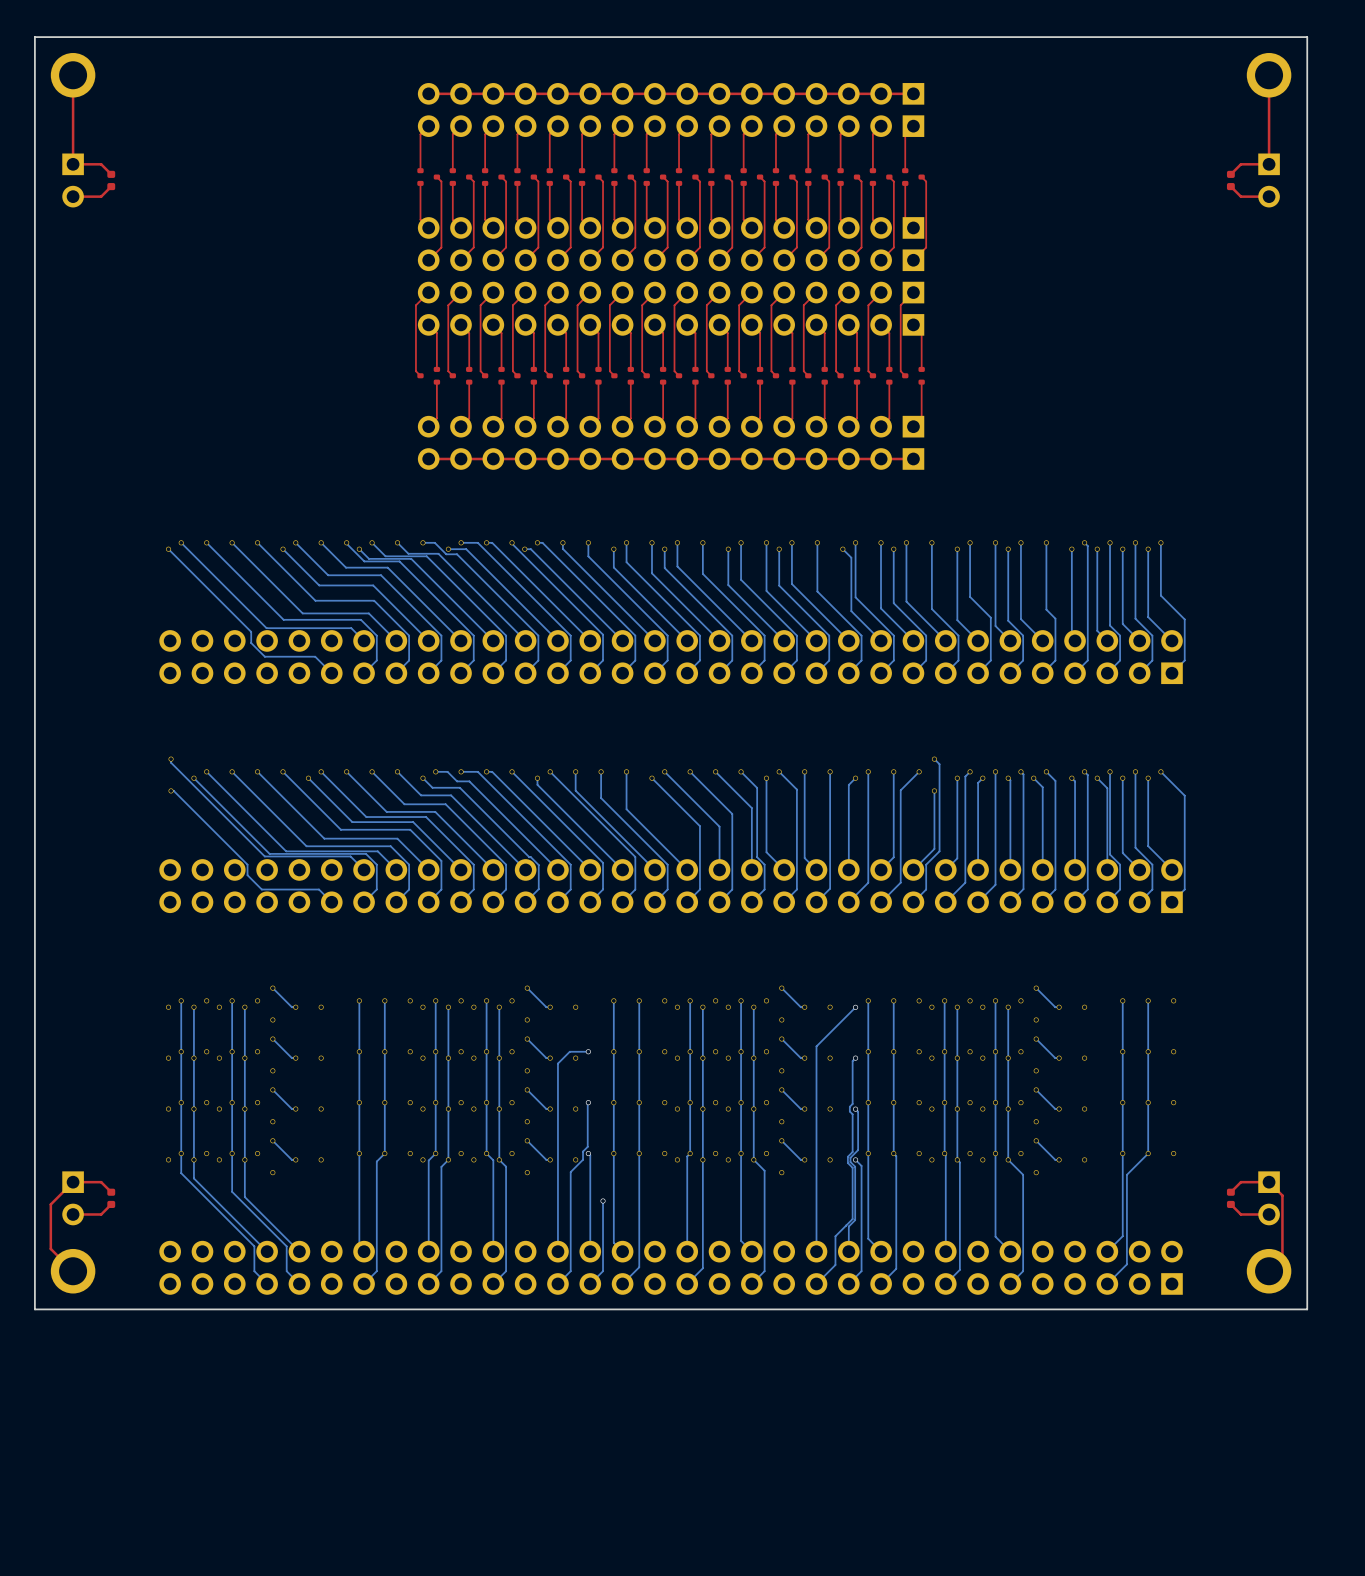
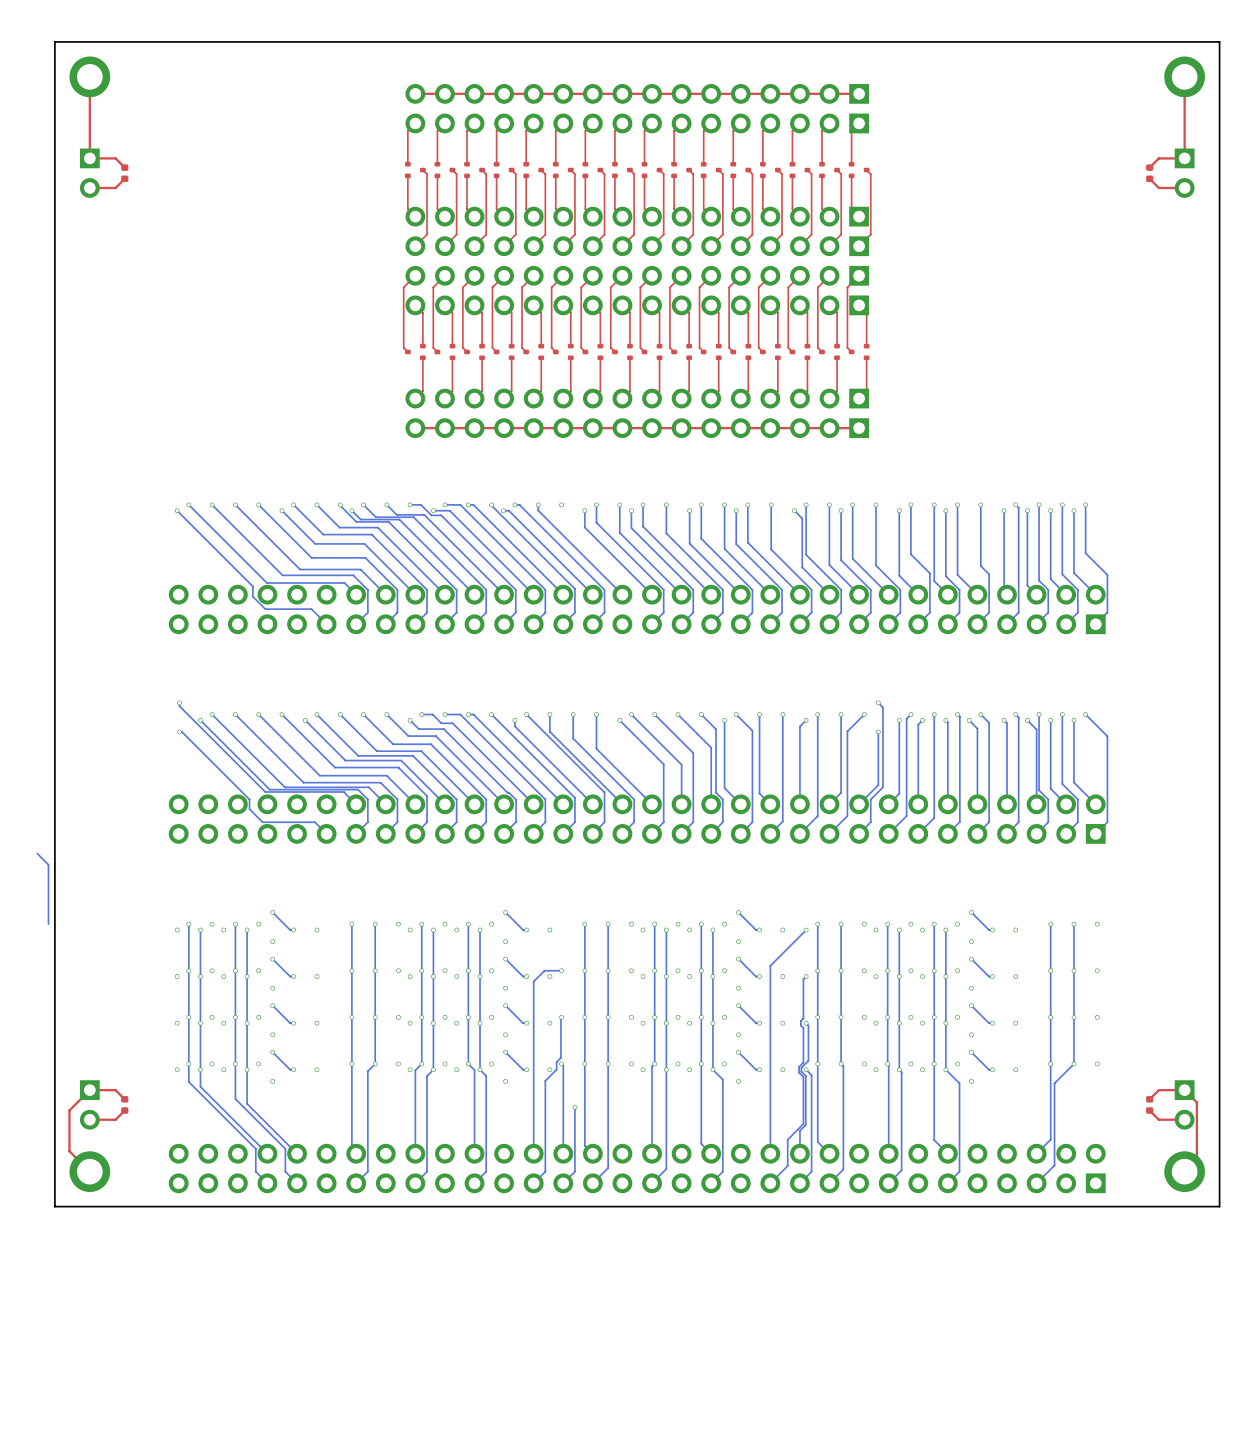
bottom track: (588, 542) (588, 556) (667, 635) (667, 660) (654, 673) -> none
bottom track: none -> (37, 853) (48, 864) (48, 924)

